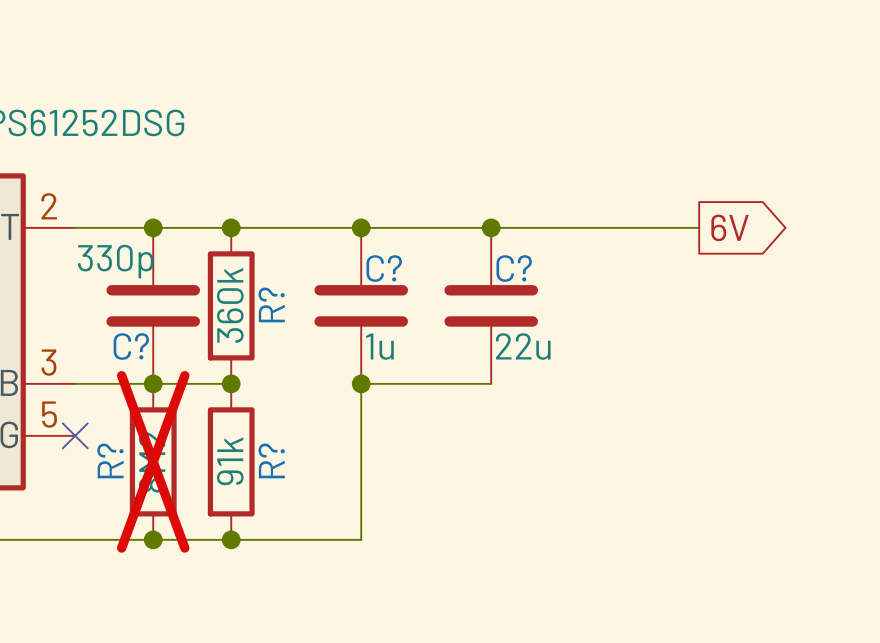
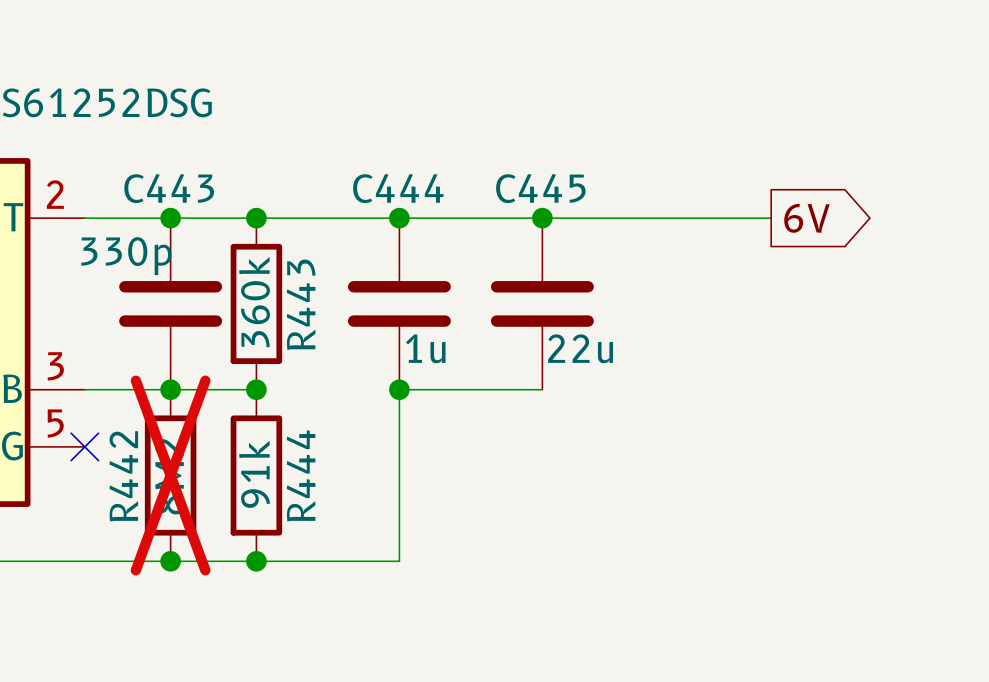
C? name: C? (384, 268) -> C444 (398, 188)
C? name: C? (514, 268) -> C445 (540, 188)
R? name: R? (271, 304) -> R443 (301, 304)
C? name: C? (131, 346) -> C443 (169, 188)
R? name: R? (110, 460) -> R442 (123, 476)
R? name: R? (271, 460) -> R444 (301, 475)

